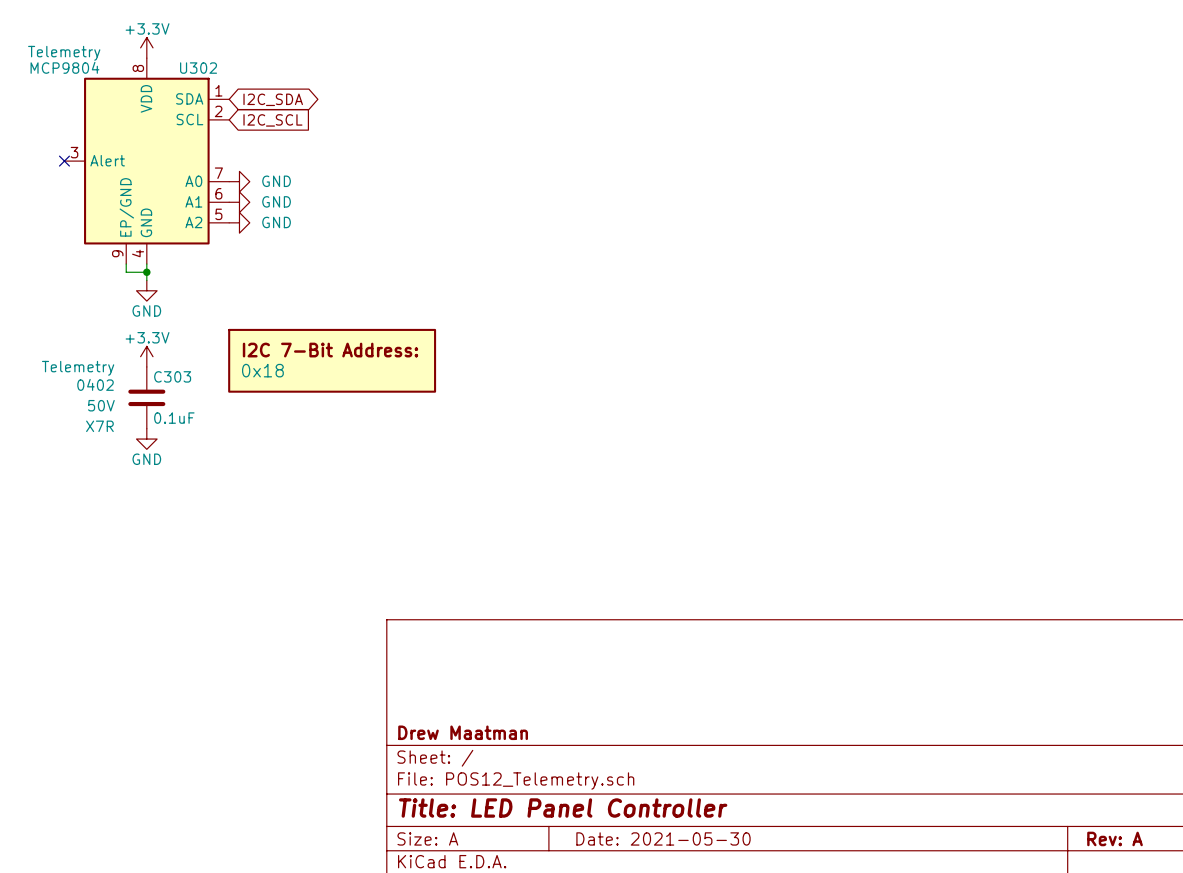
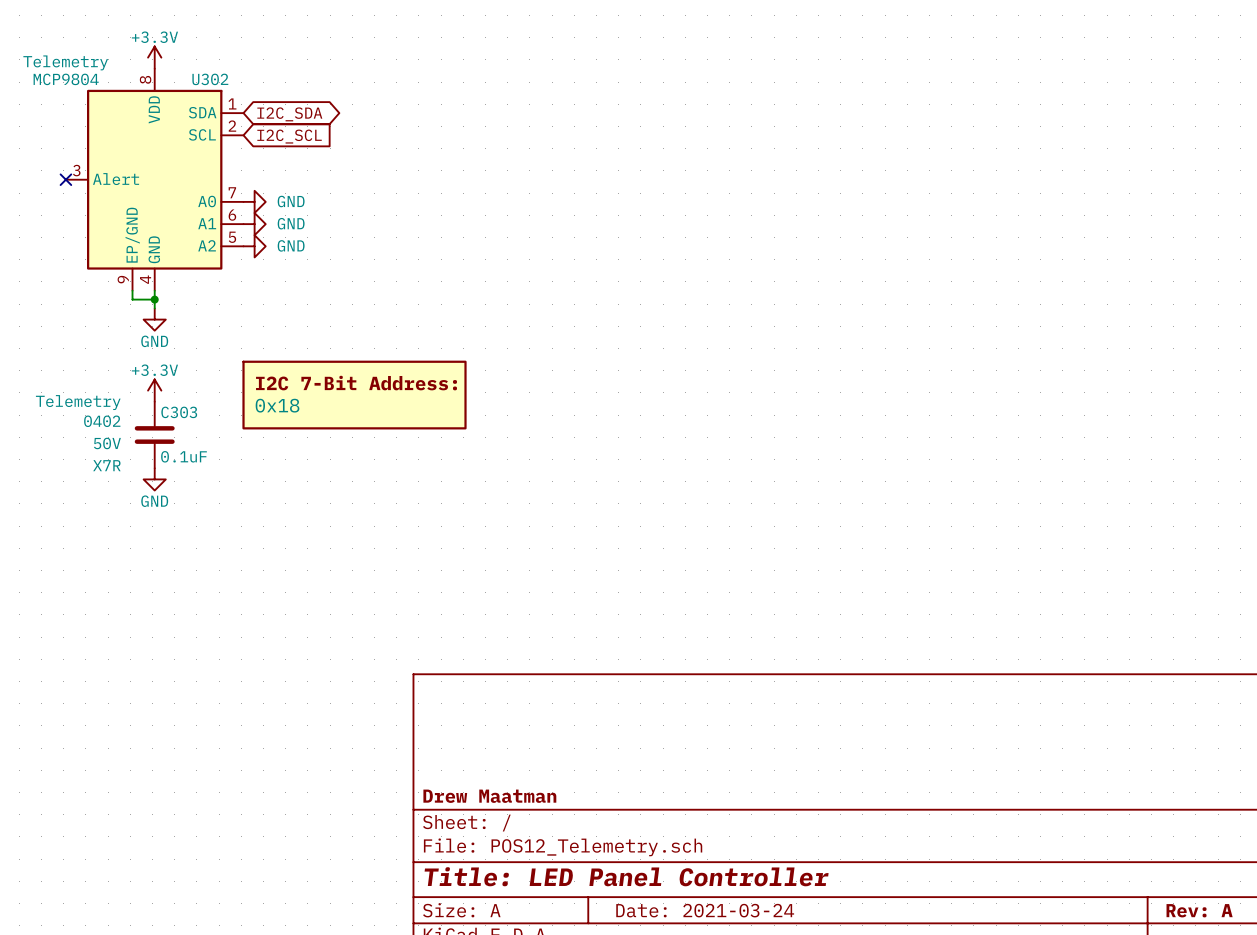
title block: Date: 2021-05-30 (663, 838) -> Date: 2021-03-24 (705, 910)

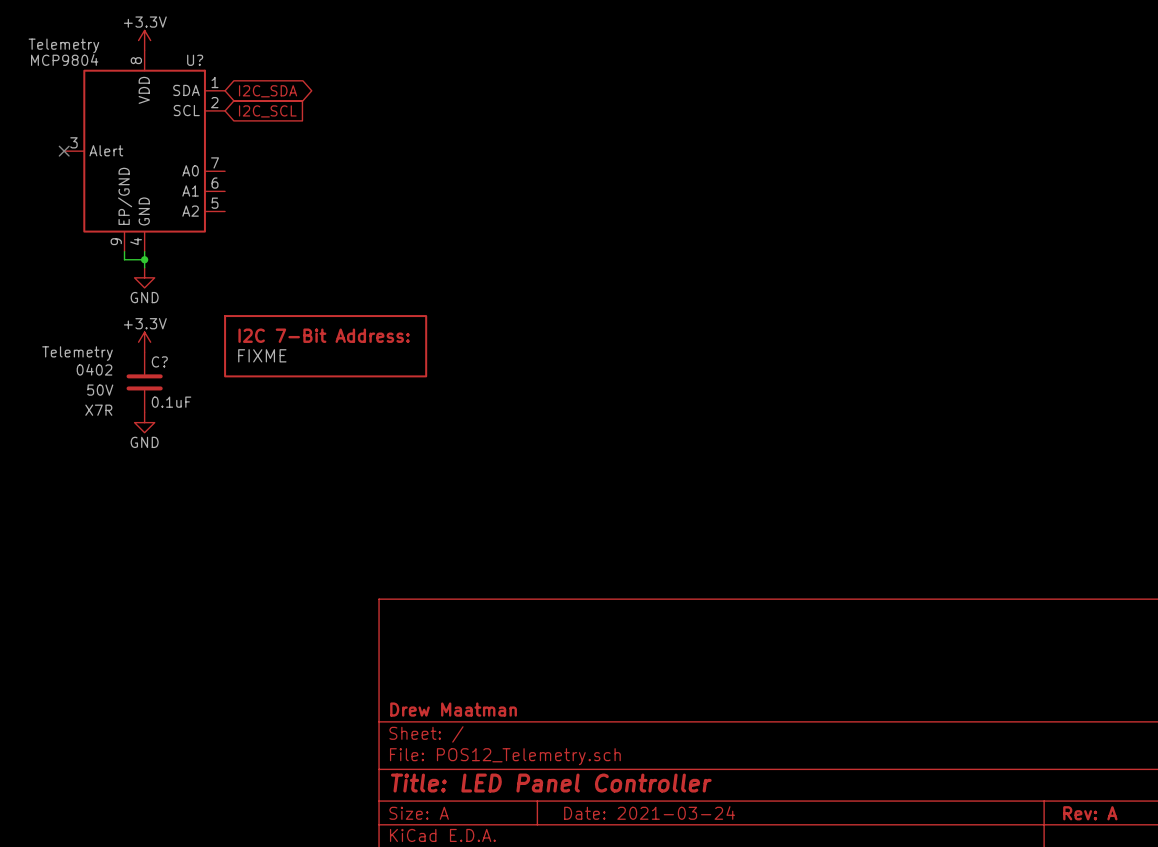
U302 name: U302 (210, 79) -> U? (195, 60)
power symbol: GND (254, 201) -> none
power symbol: GND (254, 224) -> none
power symbol: GND (254, 246) -> none
part value: 0x18 (277, 405) -> FIXME (262, 355)
C303 name: C303 (179, 412) -> C? (159, 361)

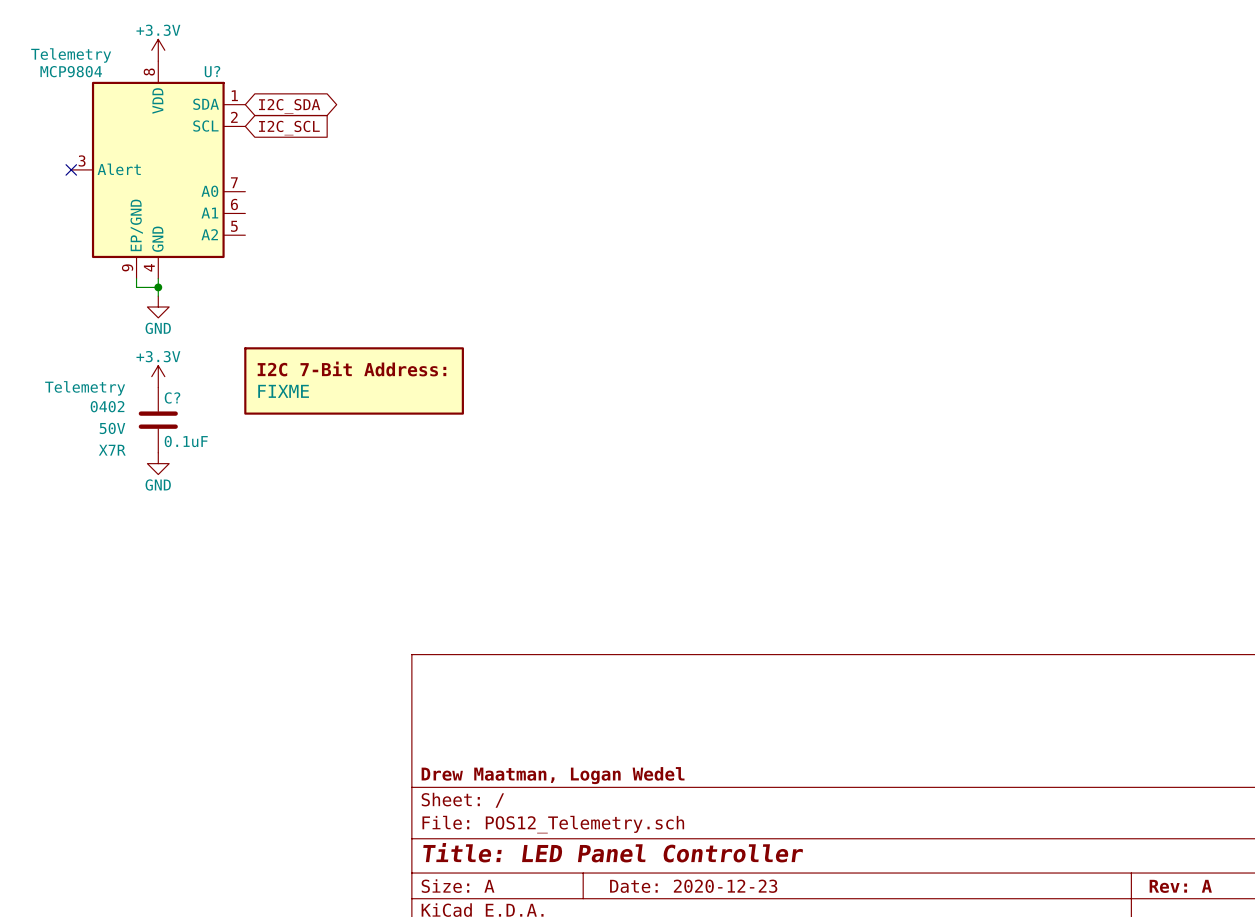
title block: Drew Maatman (453, 709) -> Drew Maatman, Logan Wedel (553, 775)
title block: Date: 2021-03-24 (649, 812) -> Date: 2020-12-23 (693, 886)

